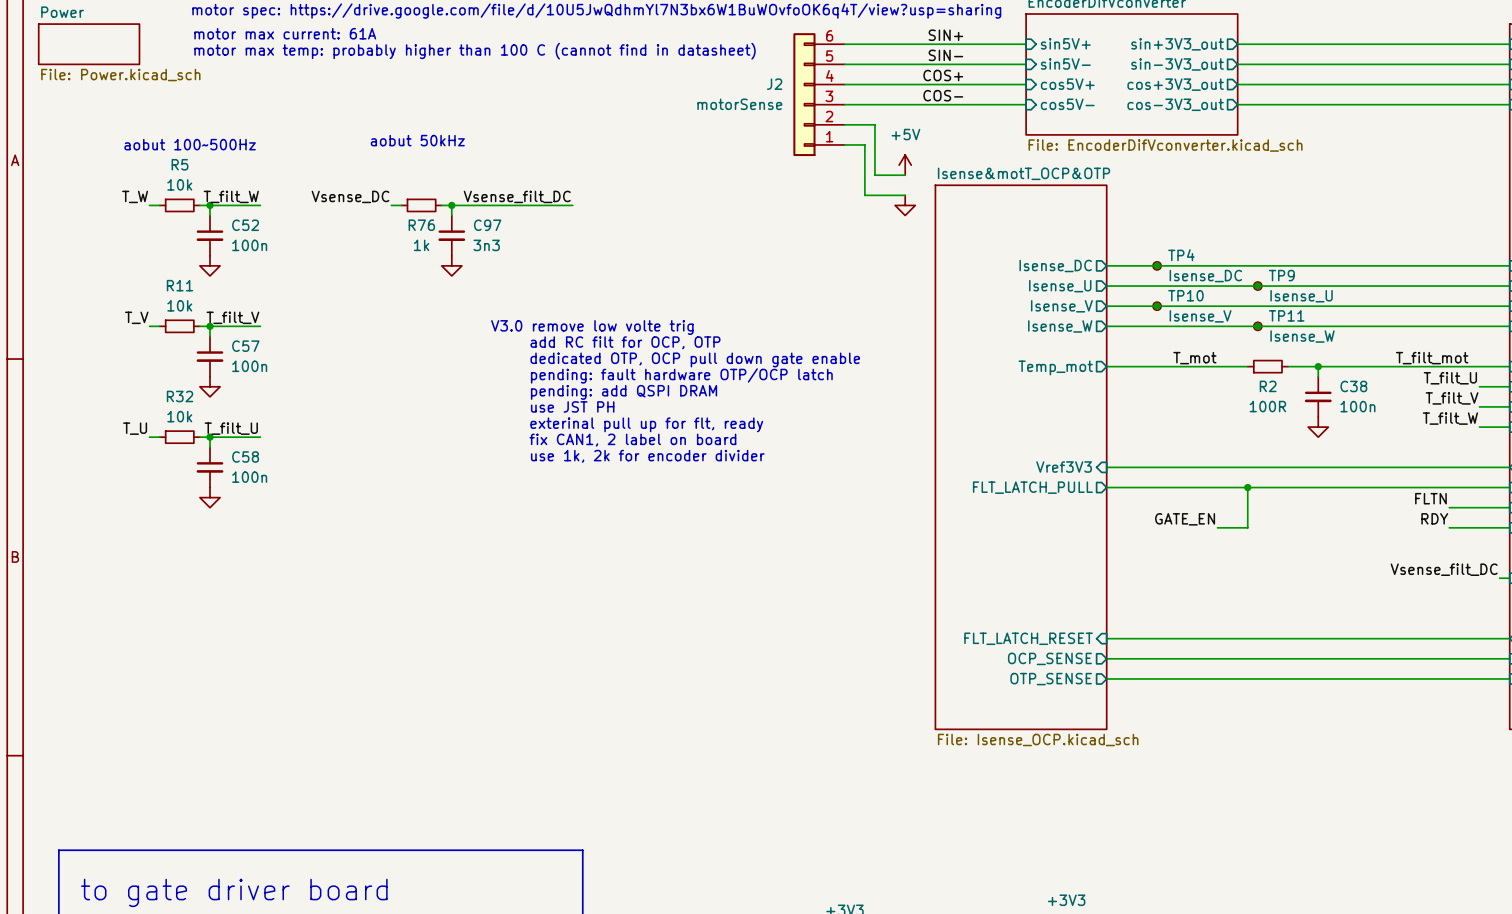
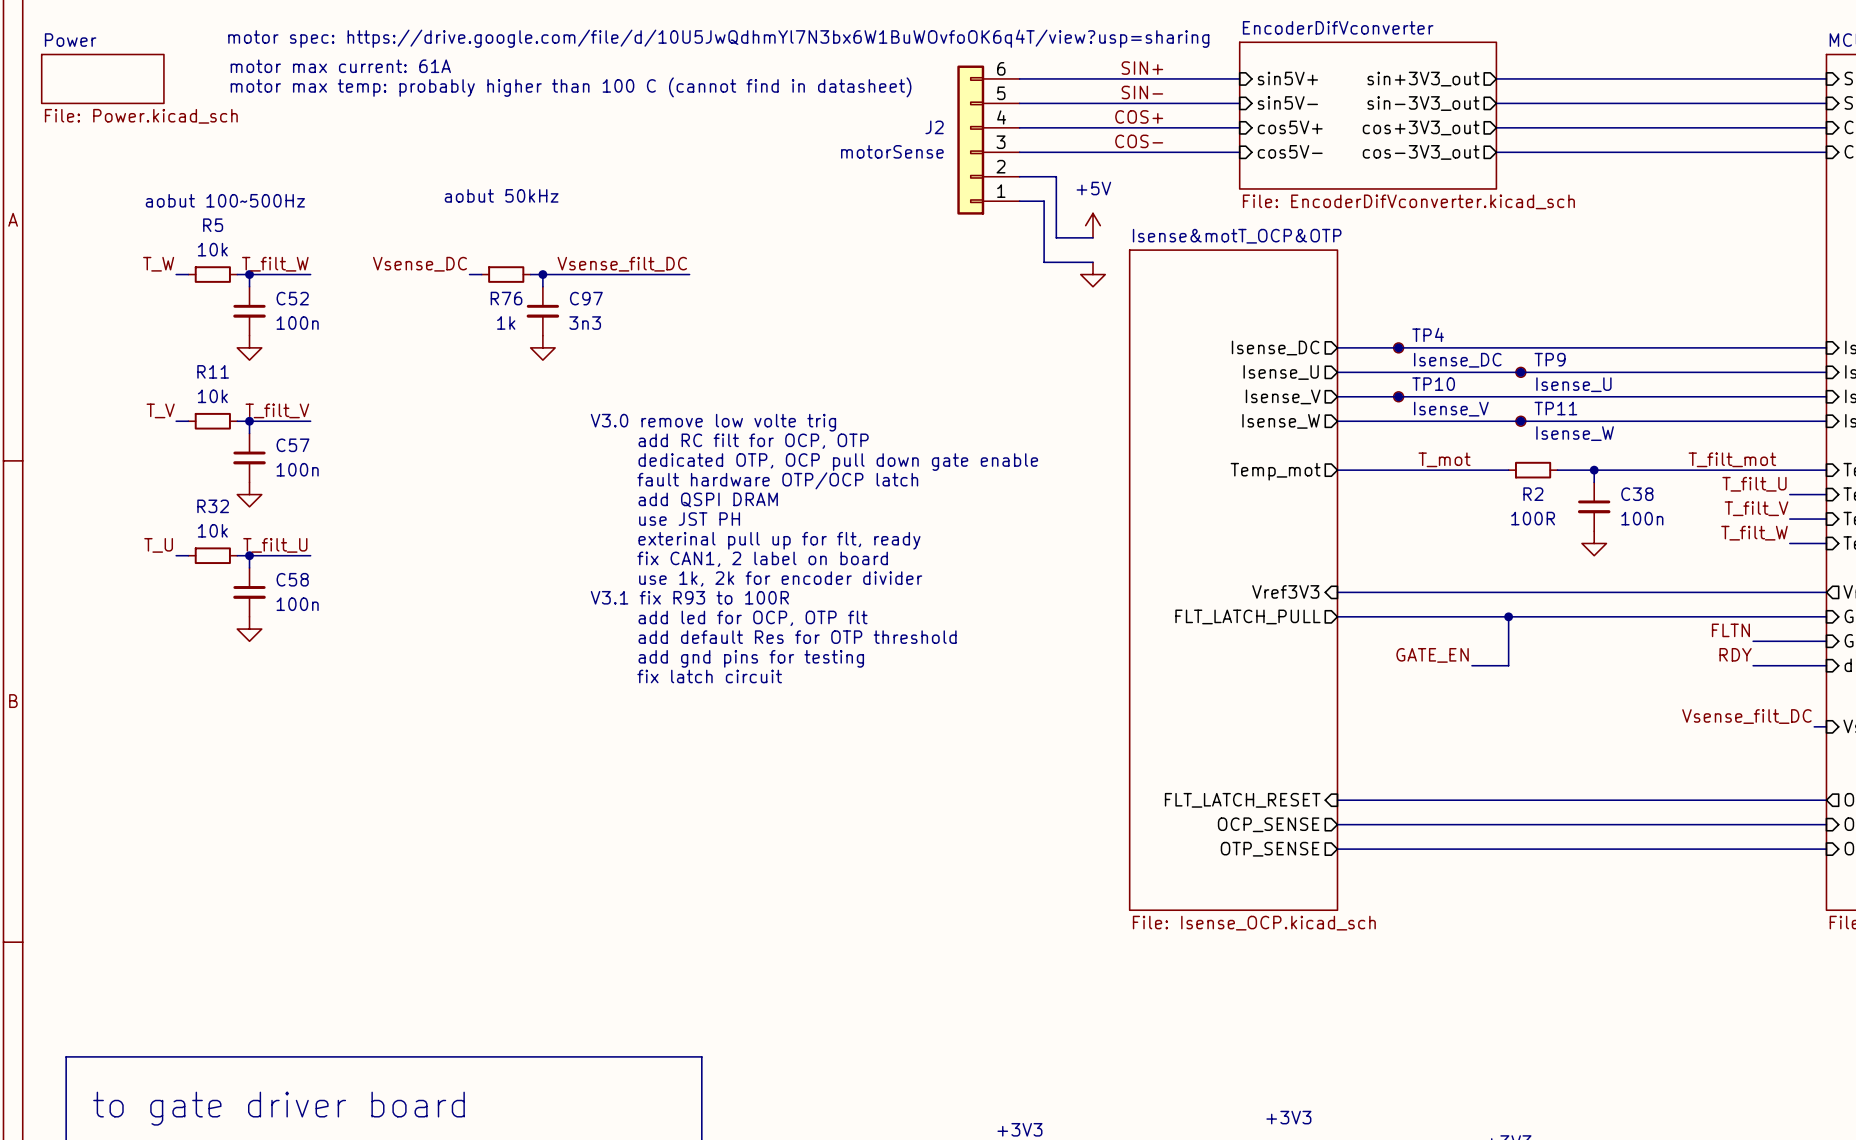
text: pending: fault hardware OTP/OCP latch (681, 375) -> fault hardware OTP/OCP latch (777, 480)
text: pending: add QSPI DRAM (624, 392) -> add QSPI DRAM (708, 499)
text: none -> V3.1 fix R93 to 100R (689, 597)
text: none -> add led for OCP, OTP flt (753, 618)
text: none -> add default Res for OTP threshold (797, 637)
text: none -> add gnd pins for testing (751, 658)
text: none -> fix latch circuit (709, 676)

